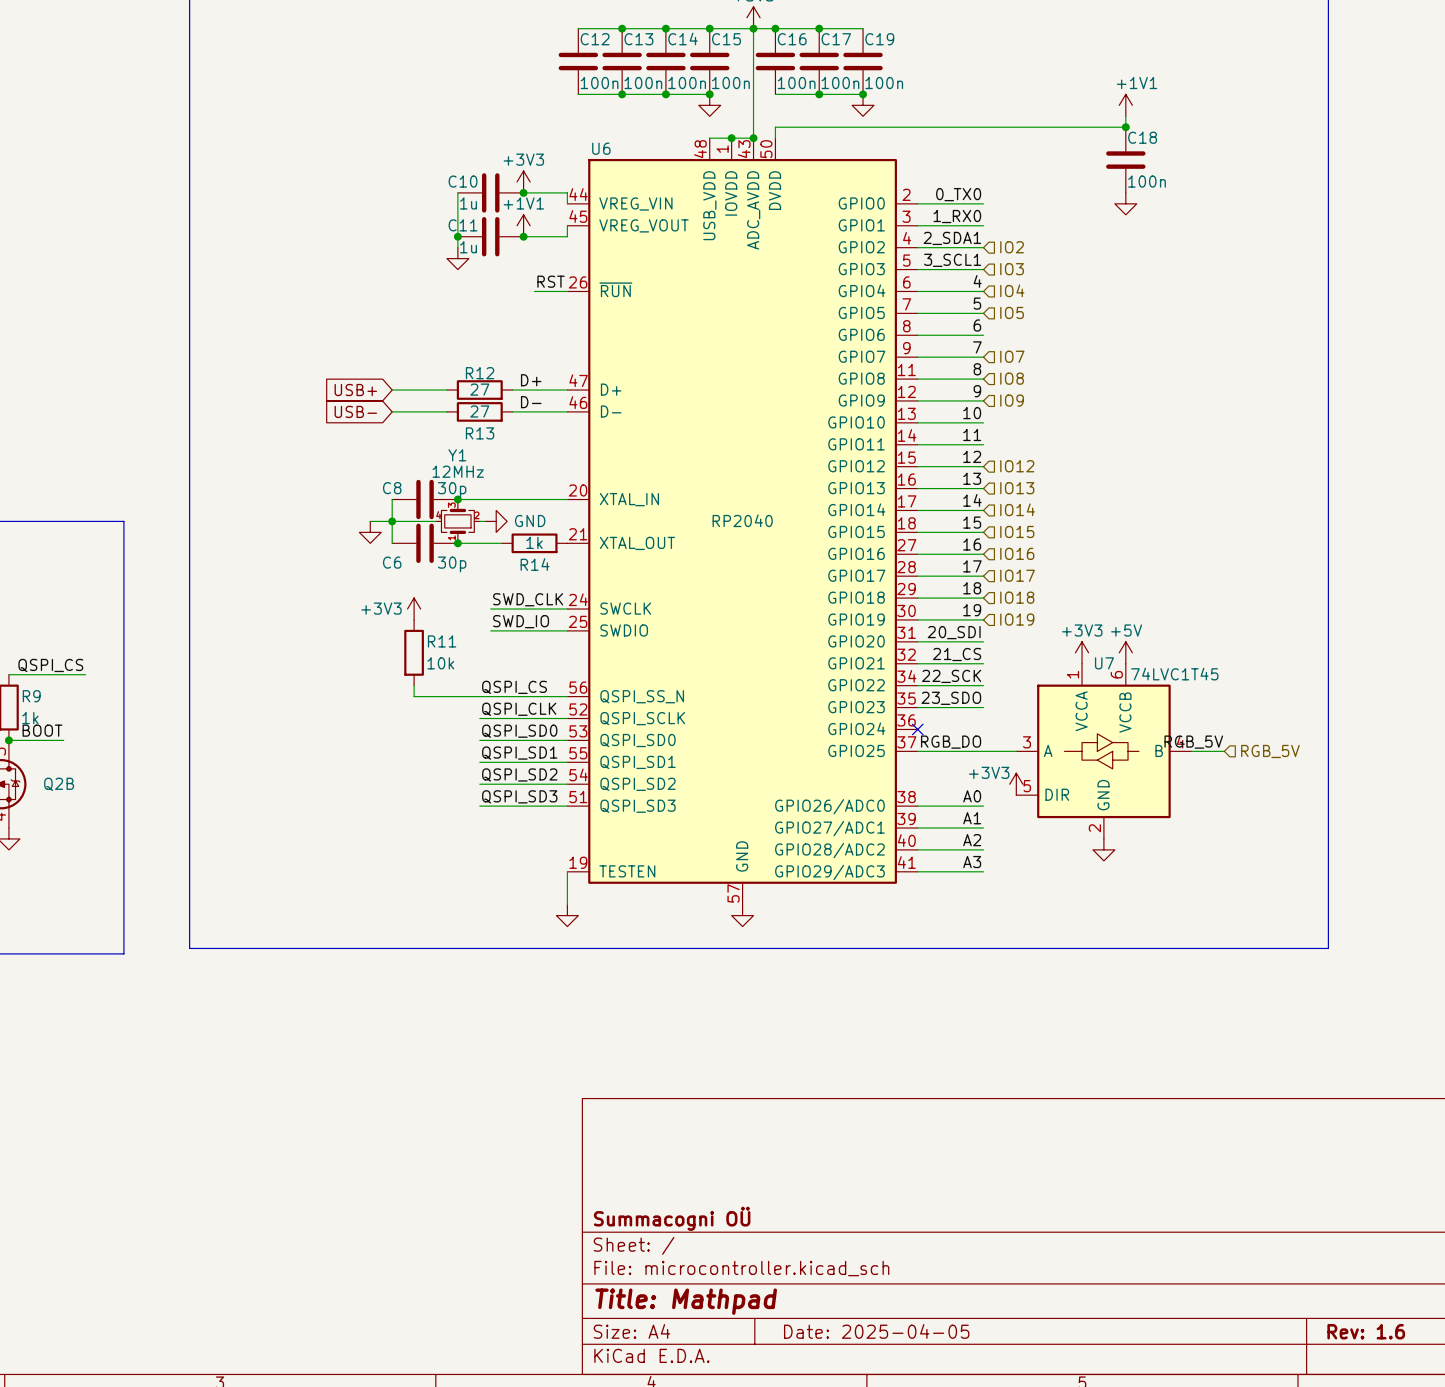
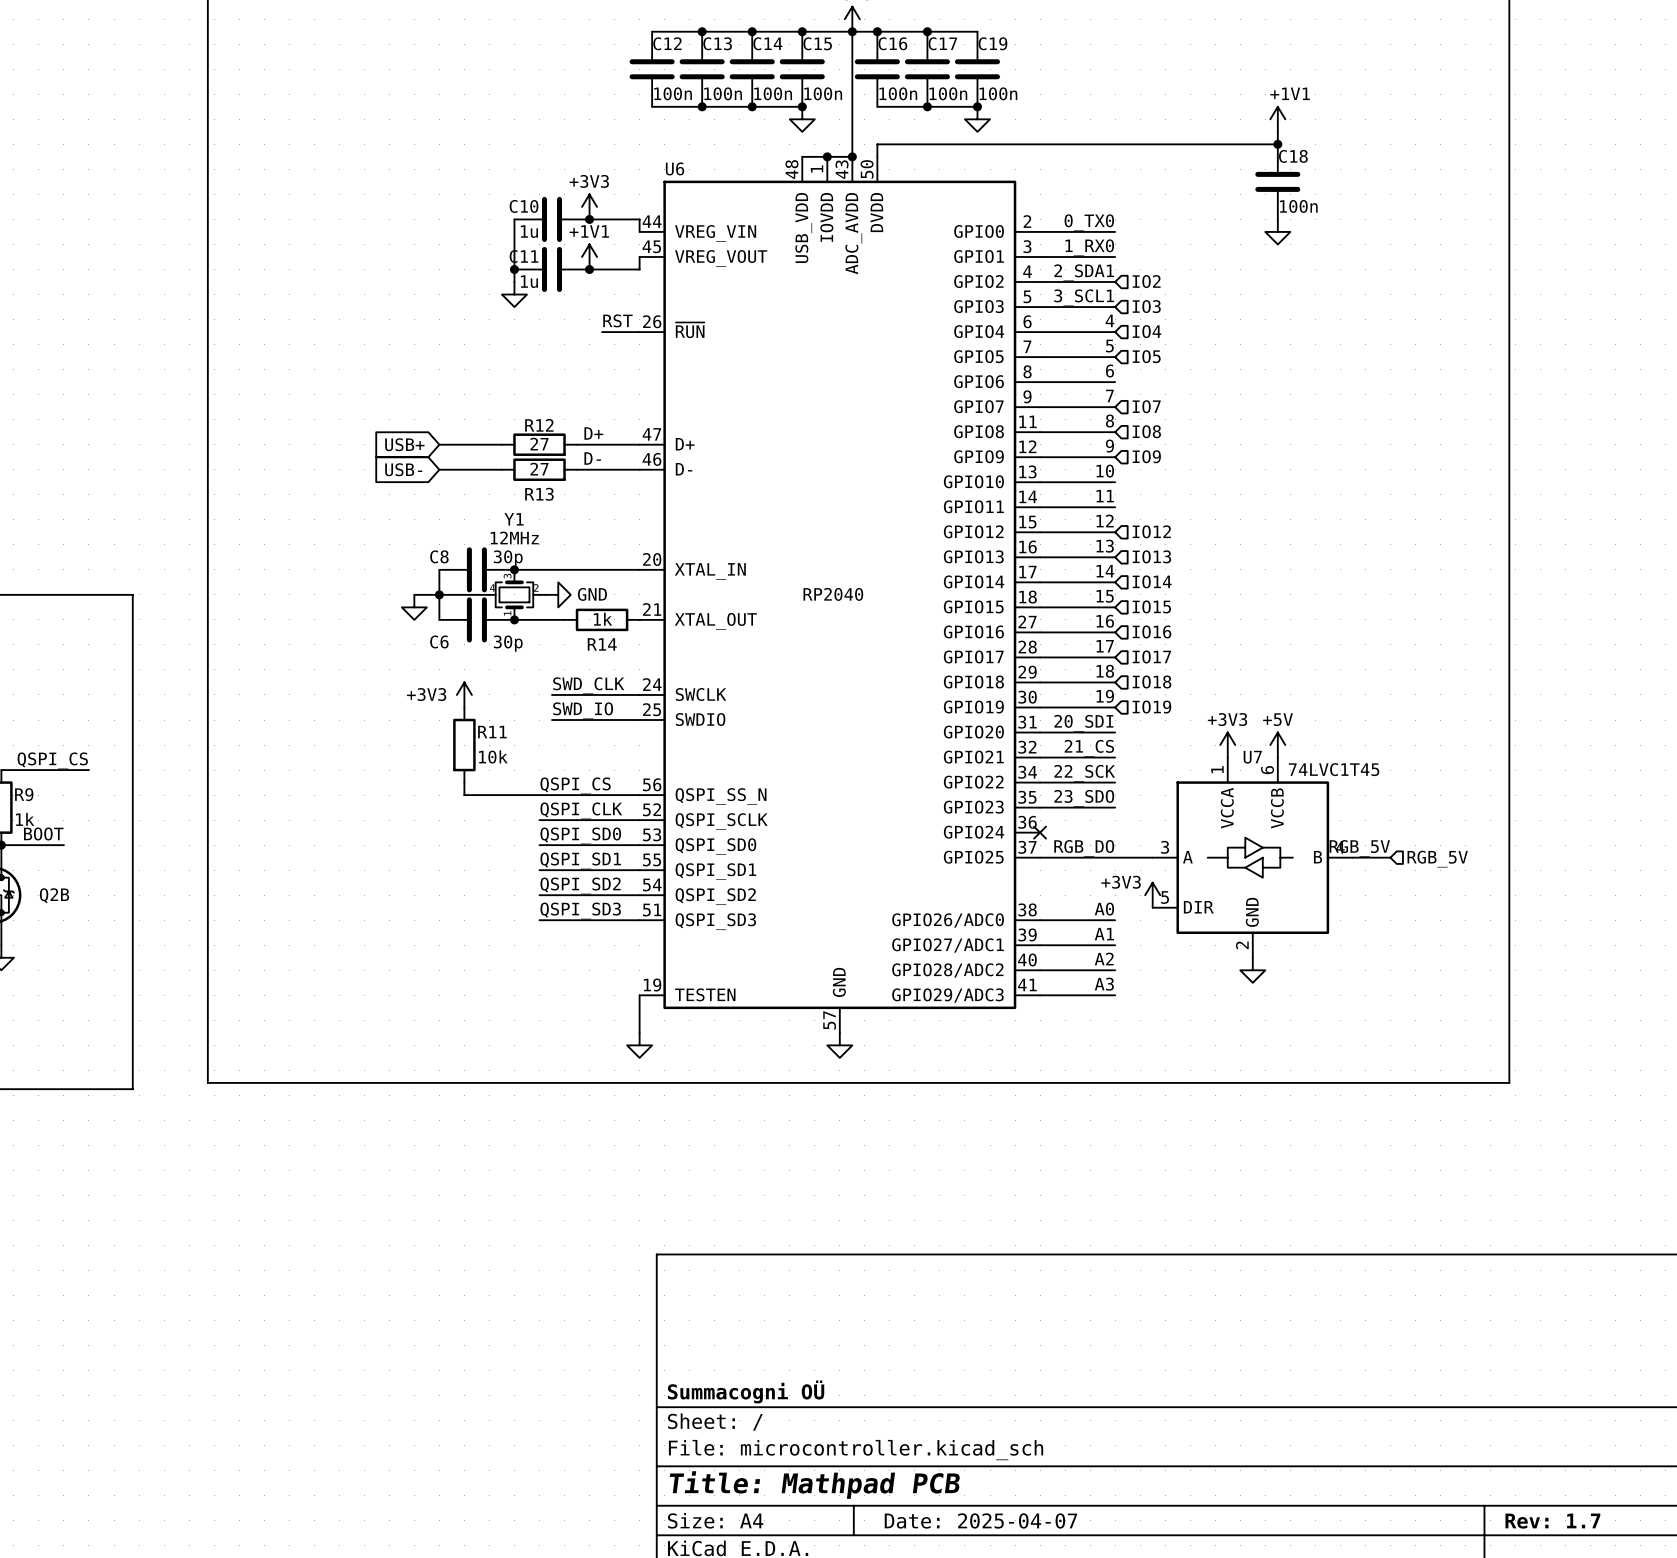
title block: Title: Mathpad (686, 1301) -> Title: Mathpad PCB (814, 1485)
title block: Date: 2025-04-05 (876, 1331) -> Date: 2025-04-07 (980, 1520)
title block: Rev: 1.6 (1366, 1331) -> Rev: 1.7 (1552, 1521)

